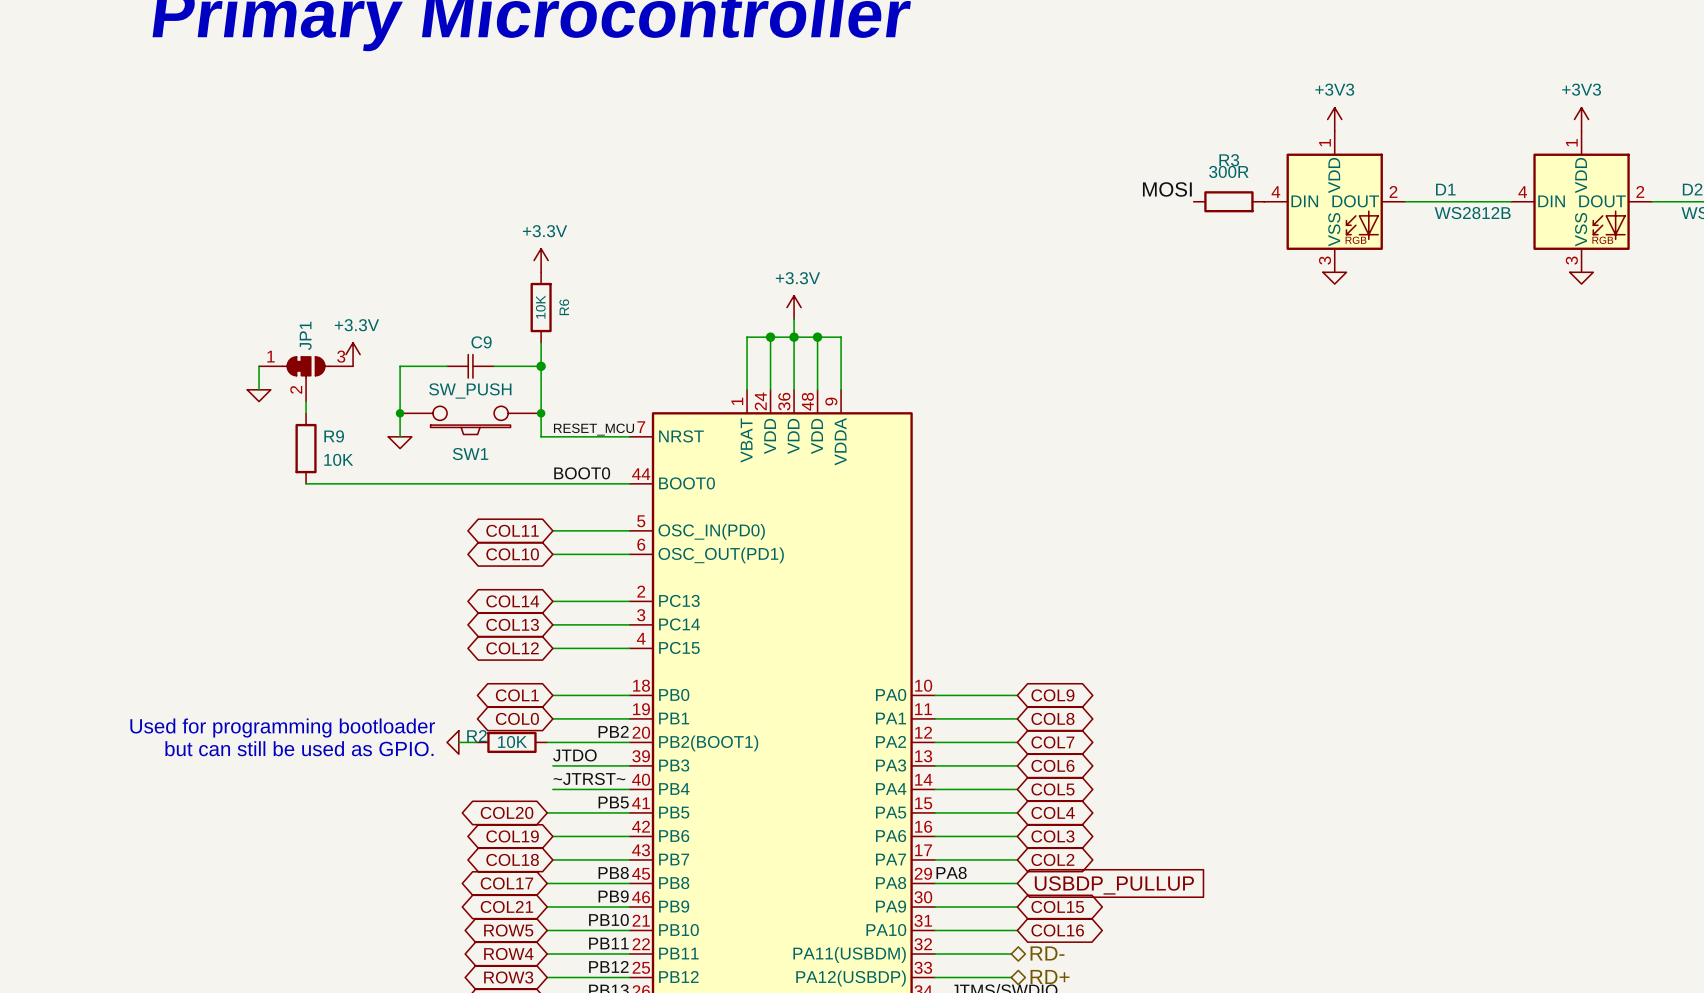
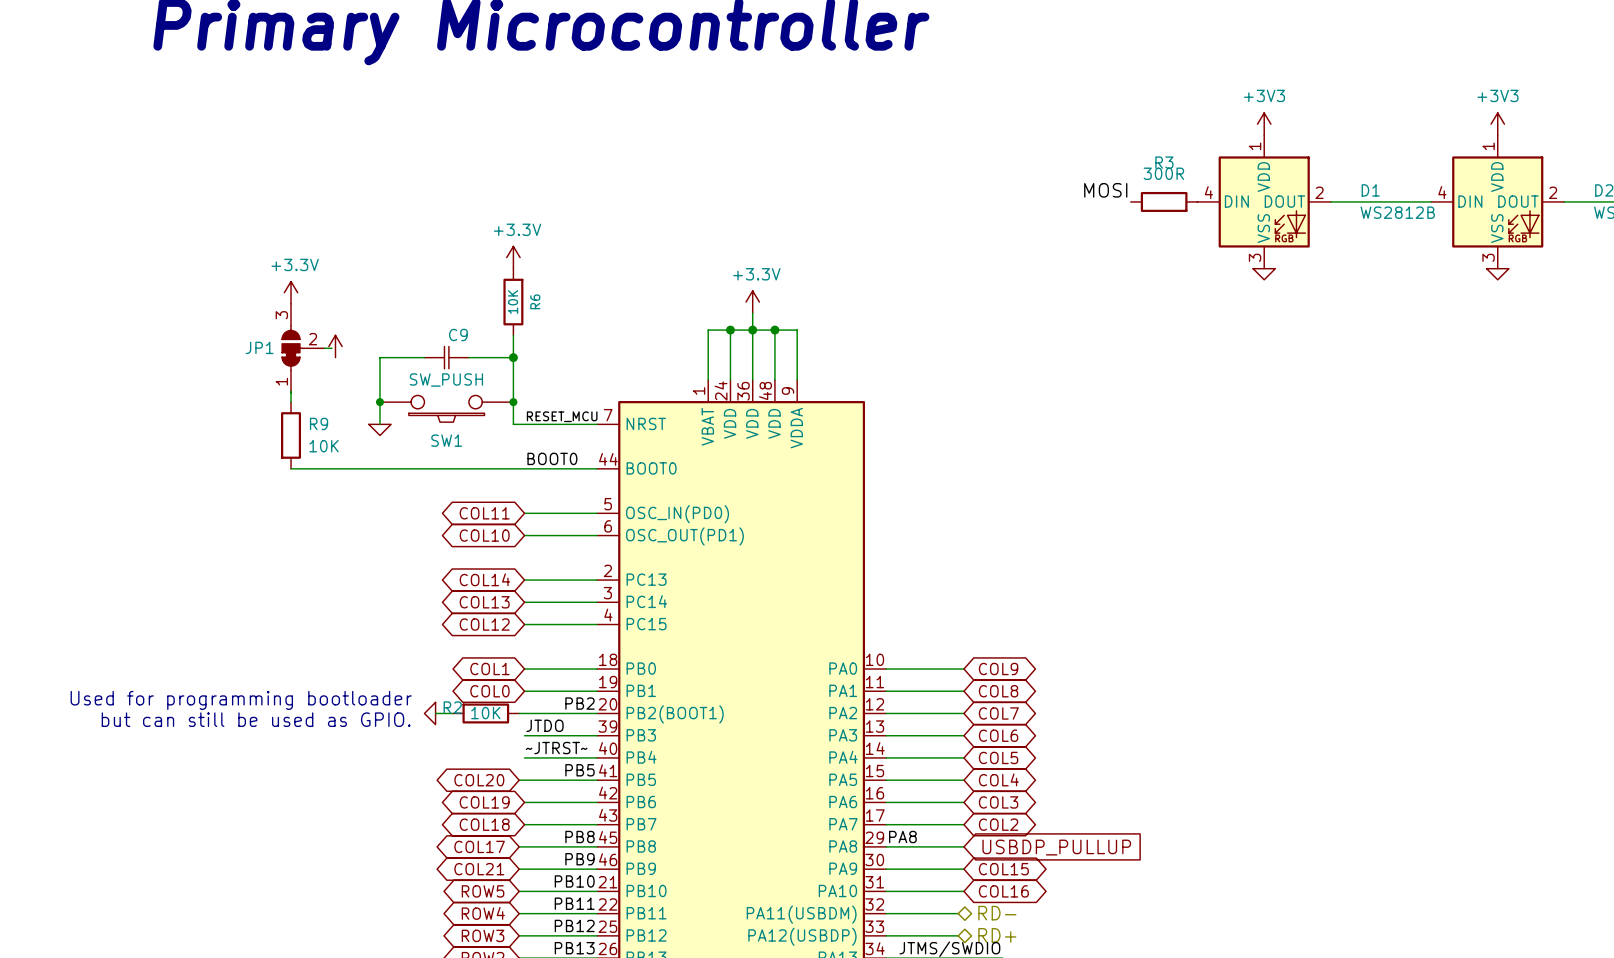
power symbol: none -> +3.3V (291, 292)
power symbol text: +3.3V (356, 325) -> none
wire: none -> (324, 348) (331, 348)
wire: (259, 366) (259, 389) -> none
JP1 rotation: 0° (306, 367) -> 90° counterclockwise (292, 348)
power symbol: (259, 395) -> none

